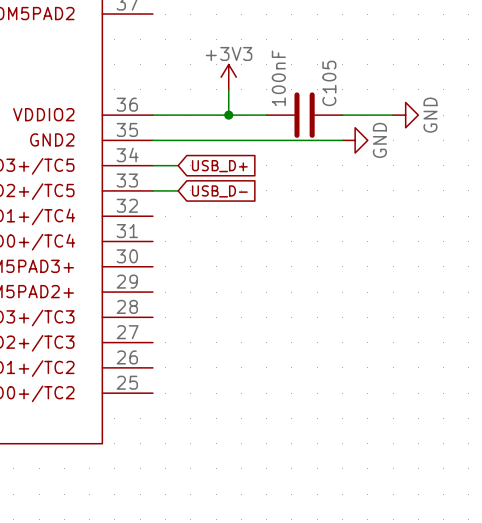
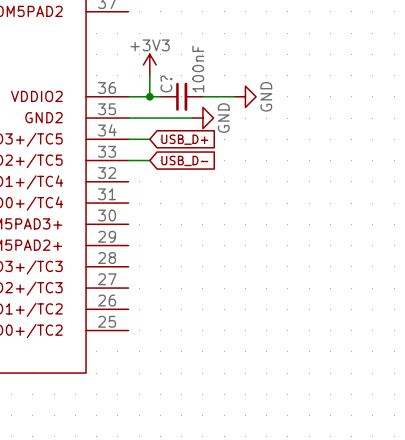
power symbol position: +3V3 (228, 77) -> +3V3 (149, 64)
wire: (228, 89) (228, 115) -> (149, 75) (149, 96)
C?: none -> 100nF (181, 96)
junction position: (228, 115) -> (149, 96)
power symbol: none -> GND (245, 96)
C105: 100nF (304, 115) -> none
wire: (342, 115) (393, 115) -> none
power symbol: GND (405, 115) -> none
wire: (228, 140) (342, 140) -> none
power symbol: none -> GND (202, 118)
power symbol: GND (355, 140) -> none

